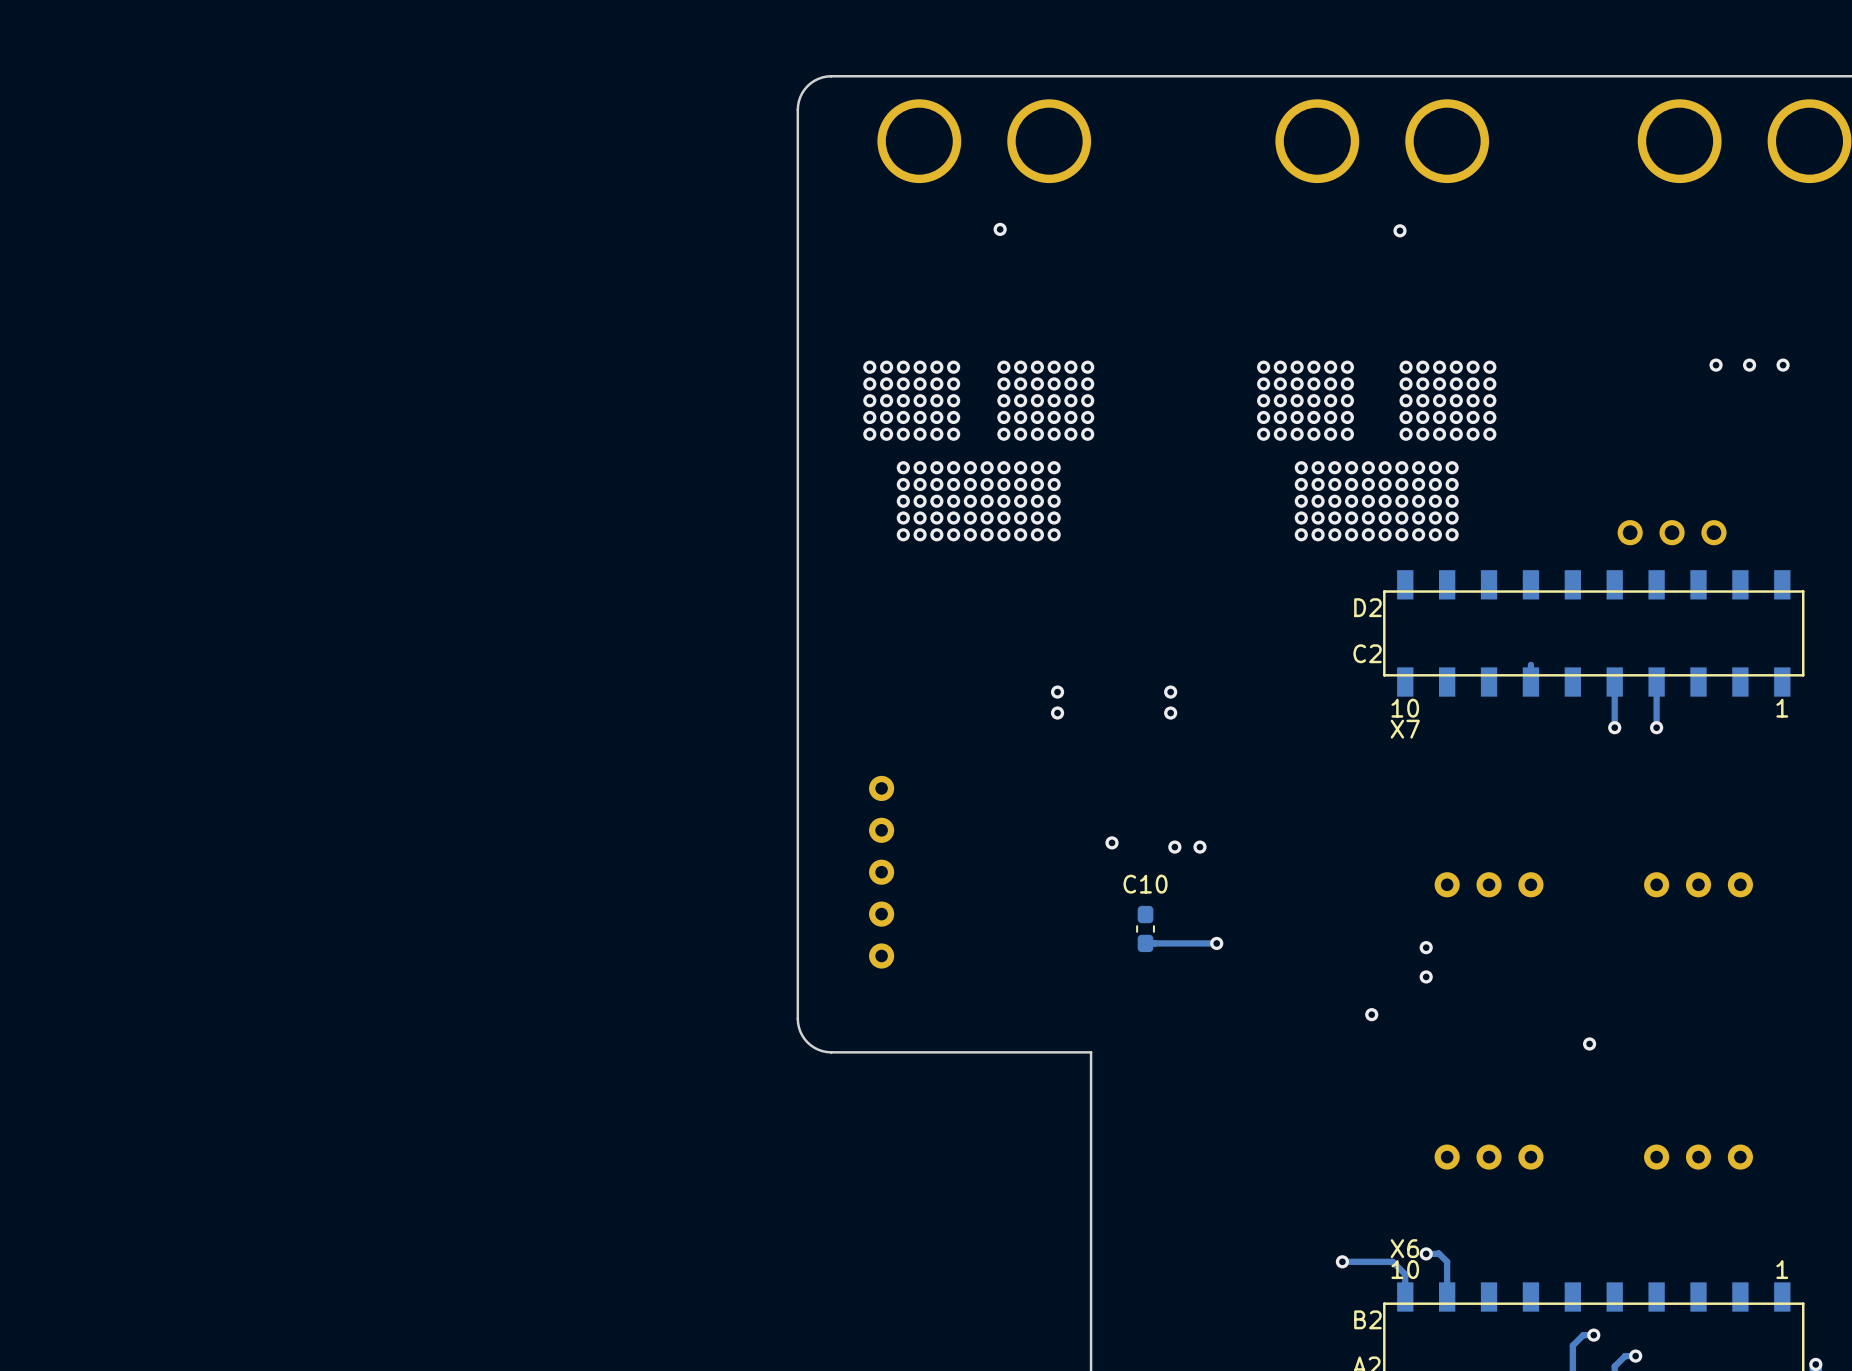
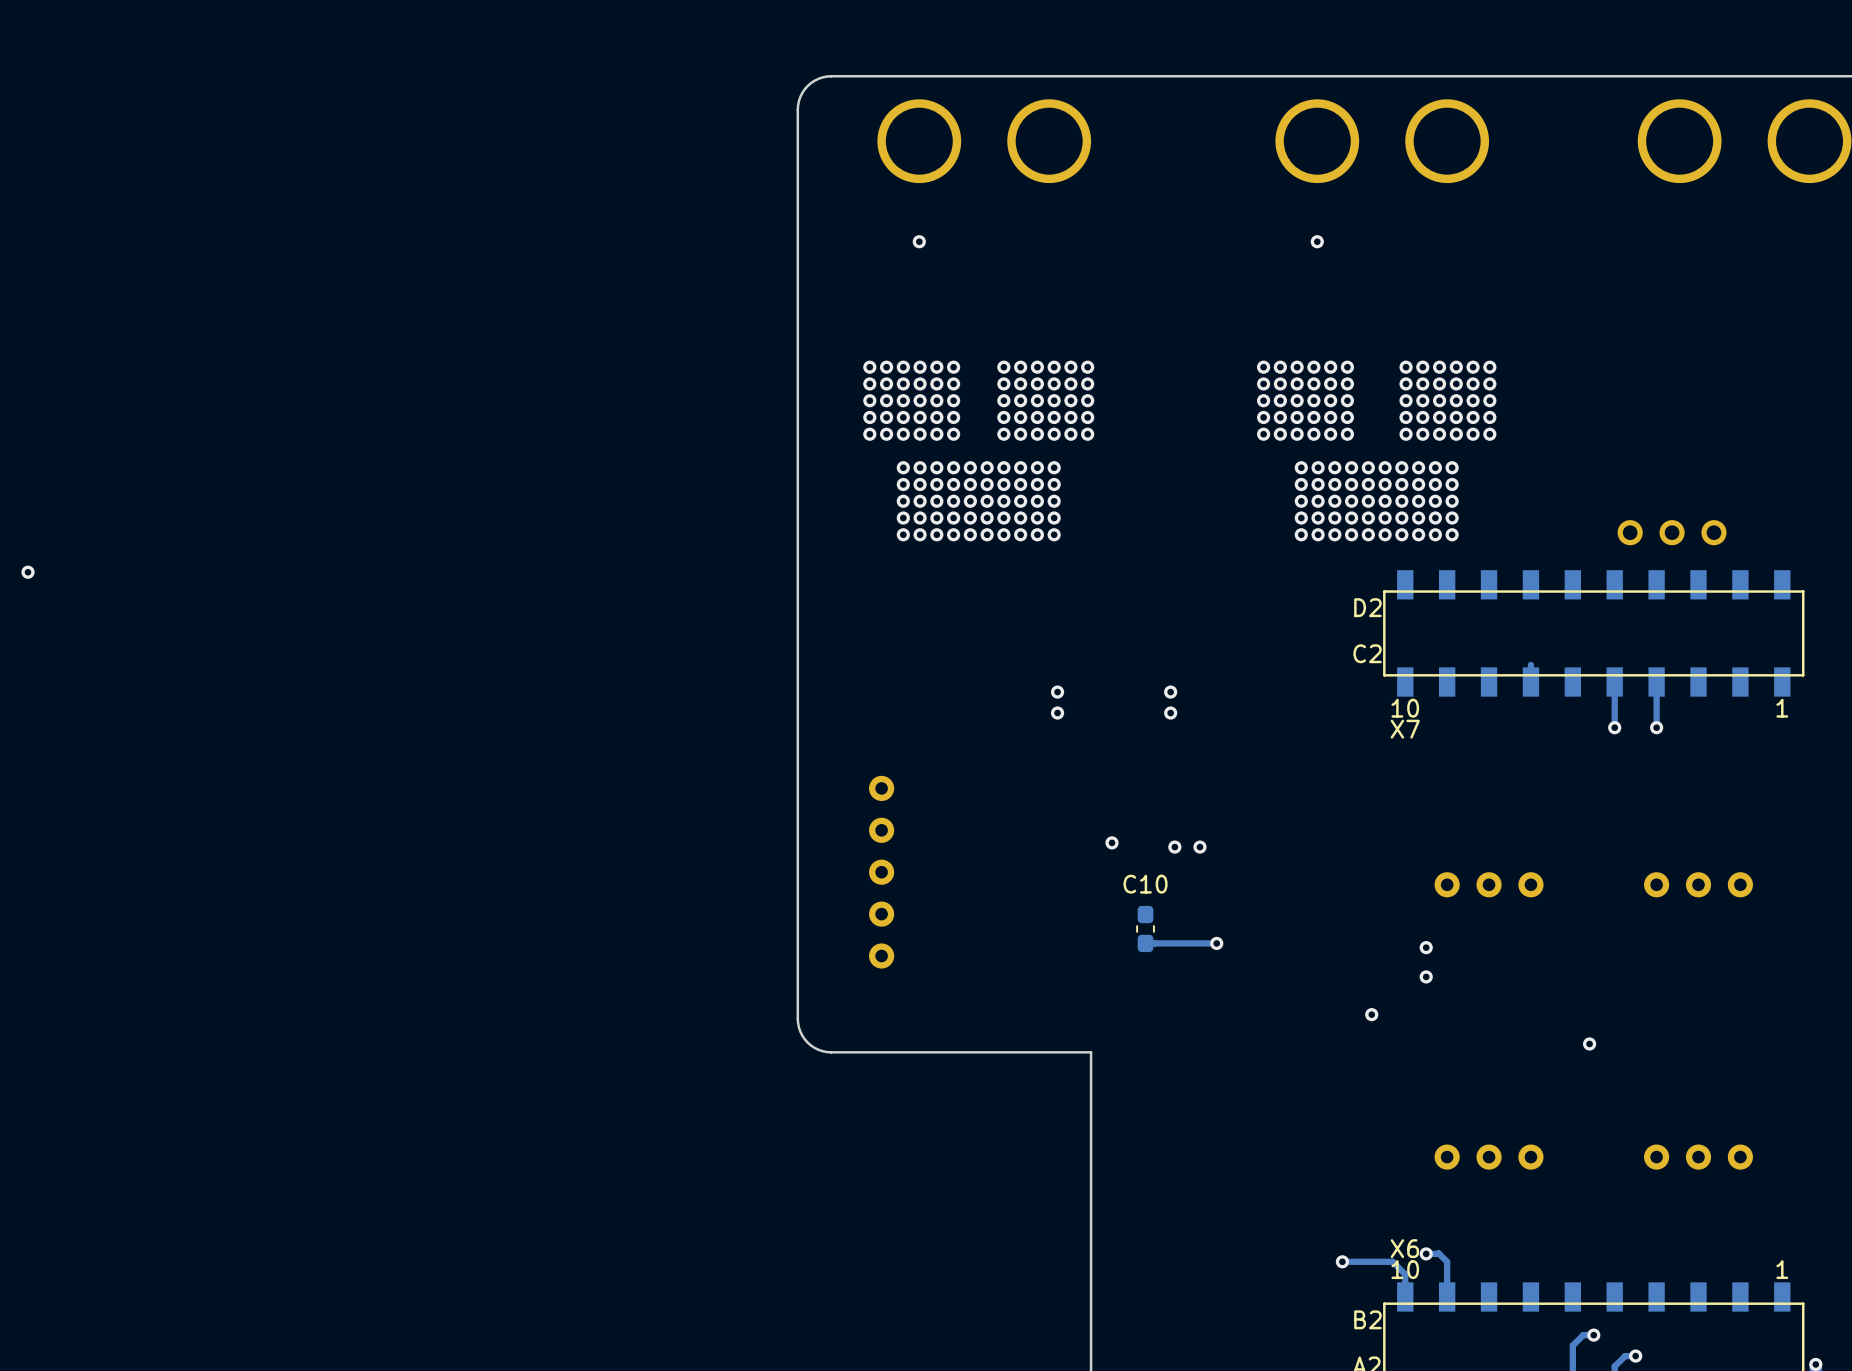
via position: (1000, 229) -> (919, 241)
via position: (1400, 230) -> (1317, 241)
via: (1716, 365) -> none
via: (1749, 365) -> none
via: (1783, 365) -> none
via: none -> (28, 572)

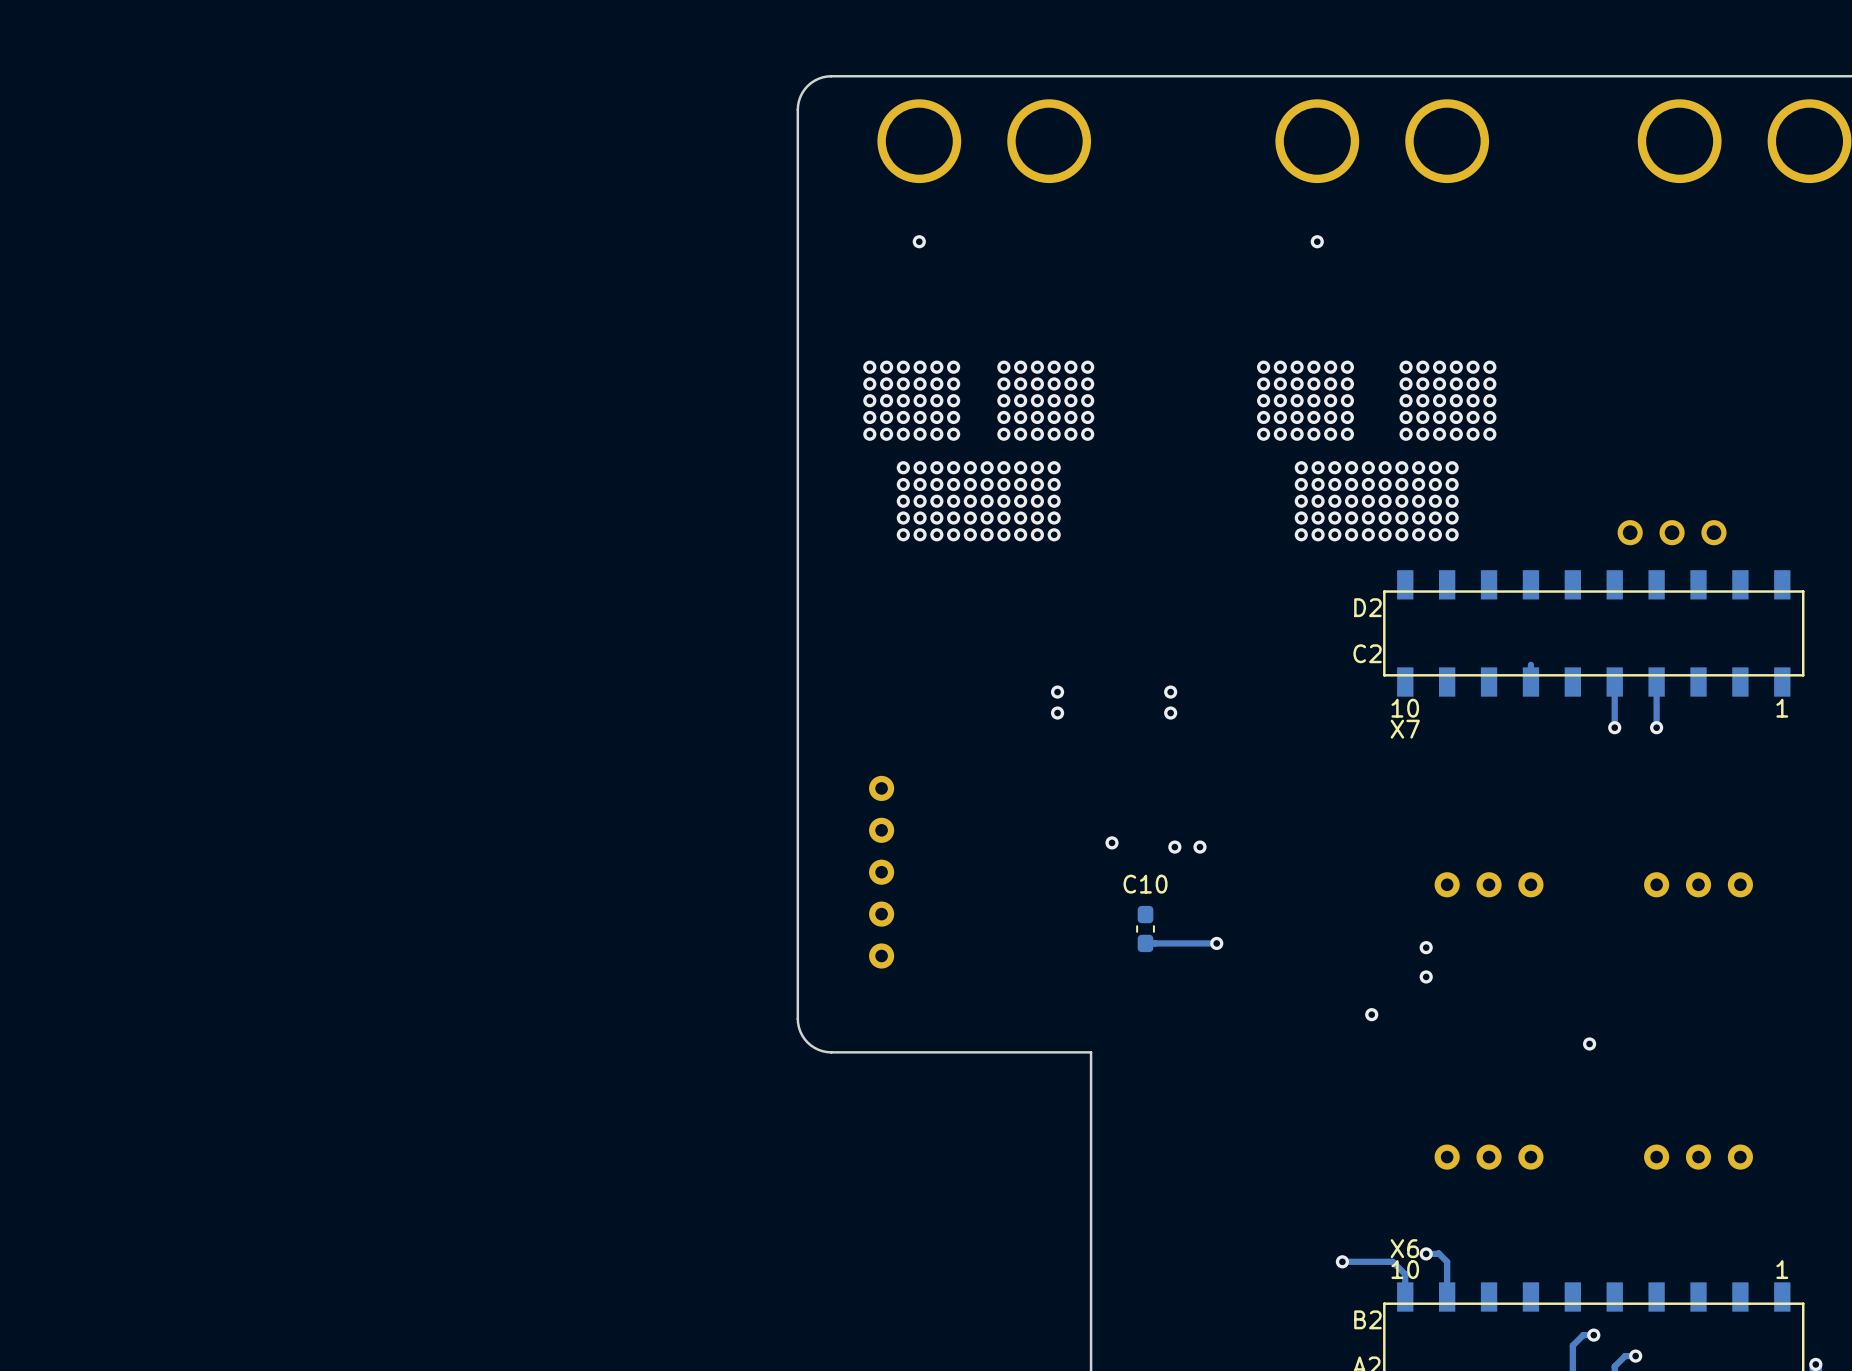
via: (28, 572) -> none

